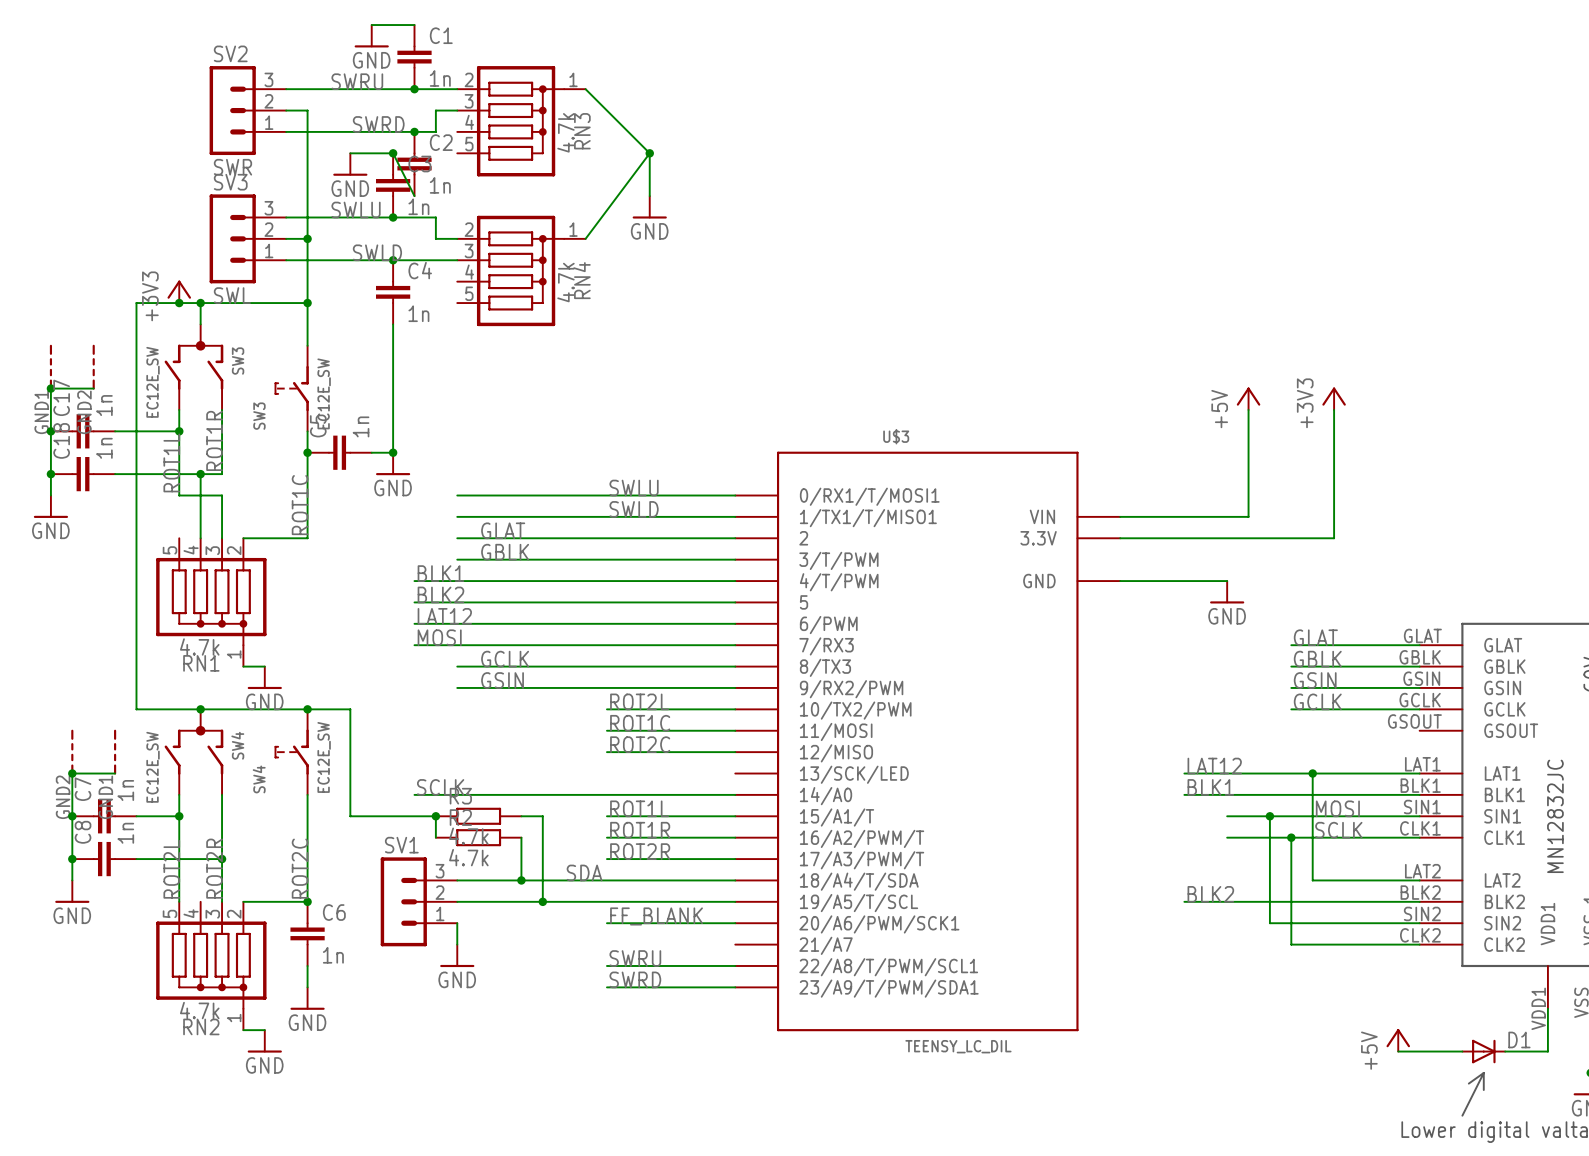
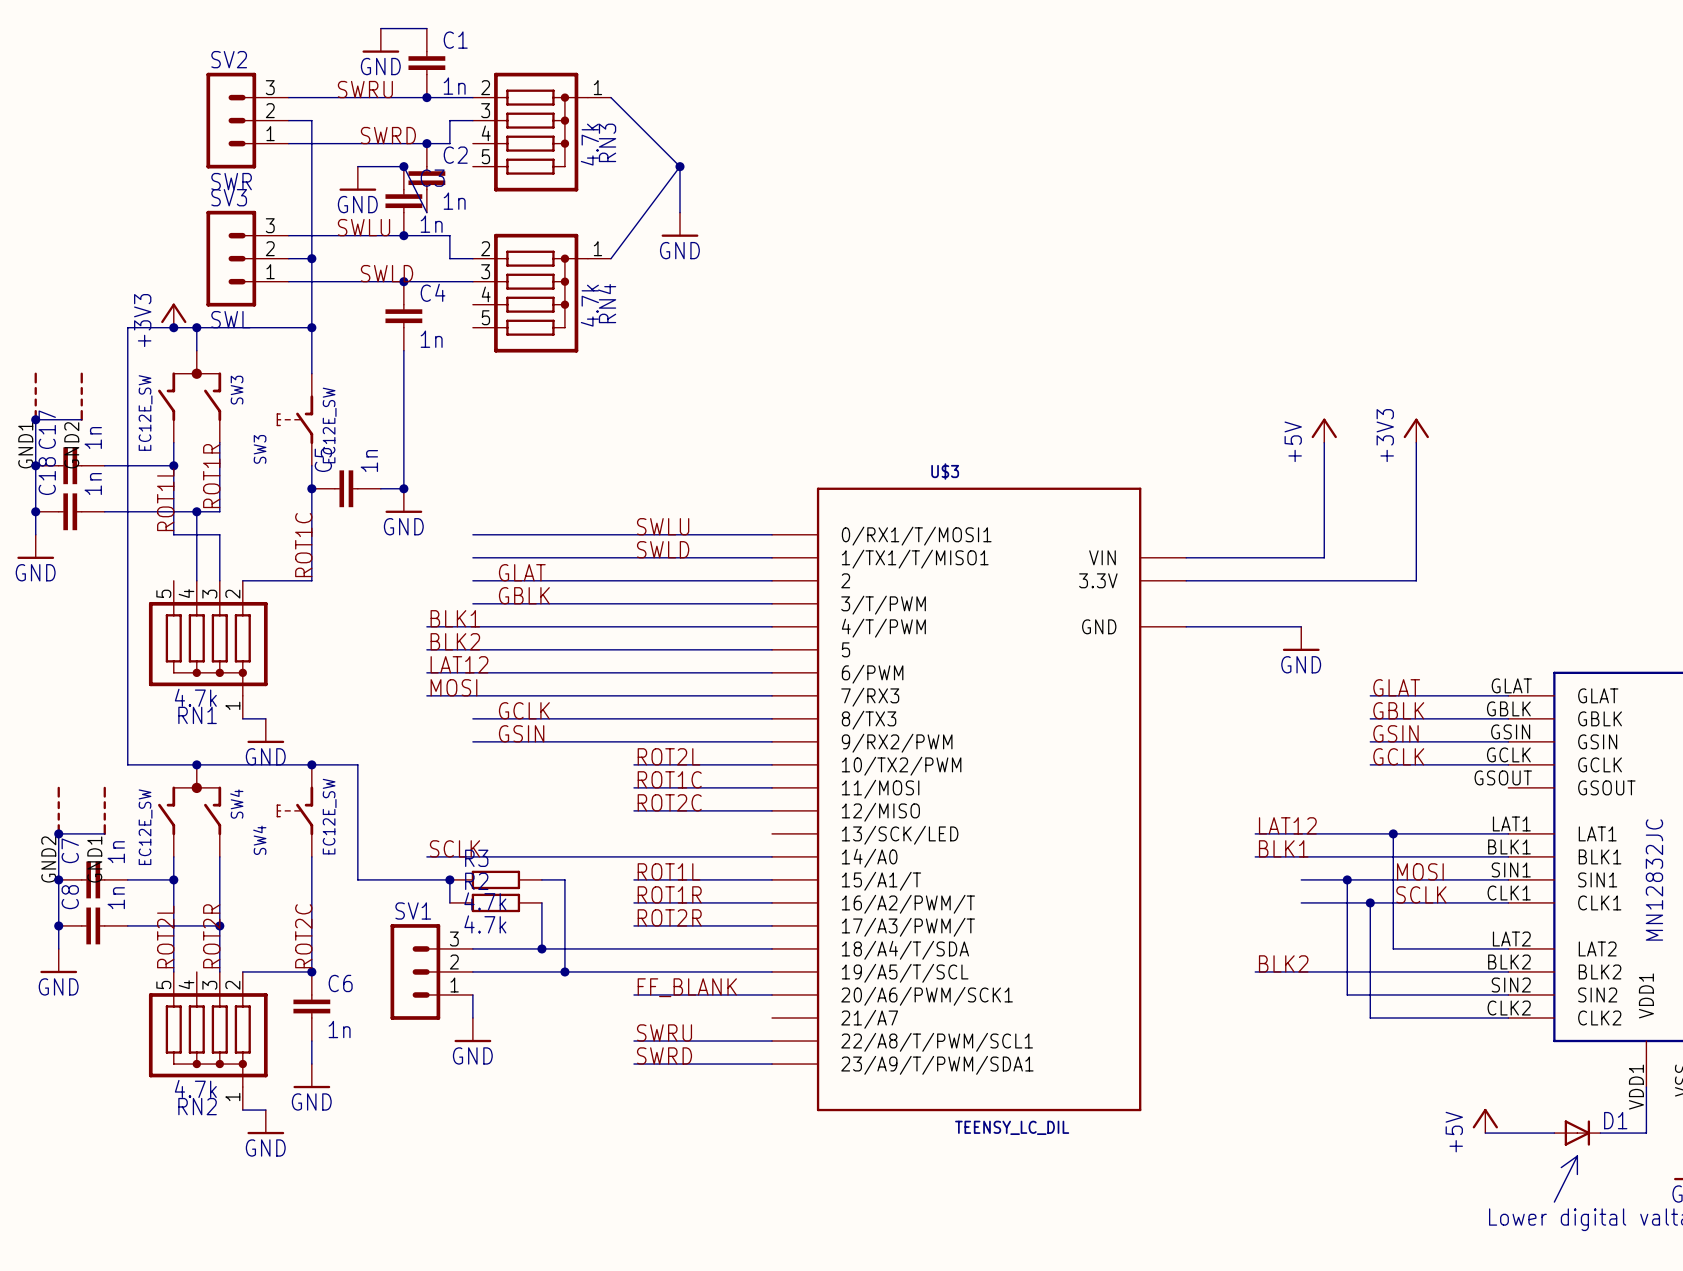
label: SDA (584, 872) -> none

